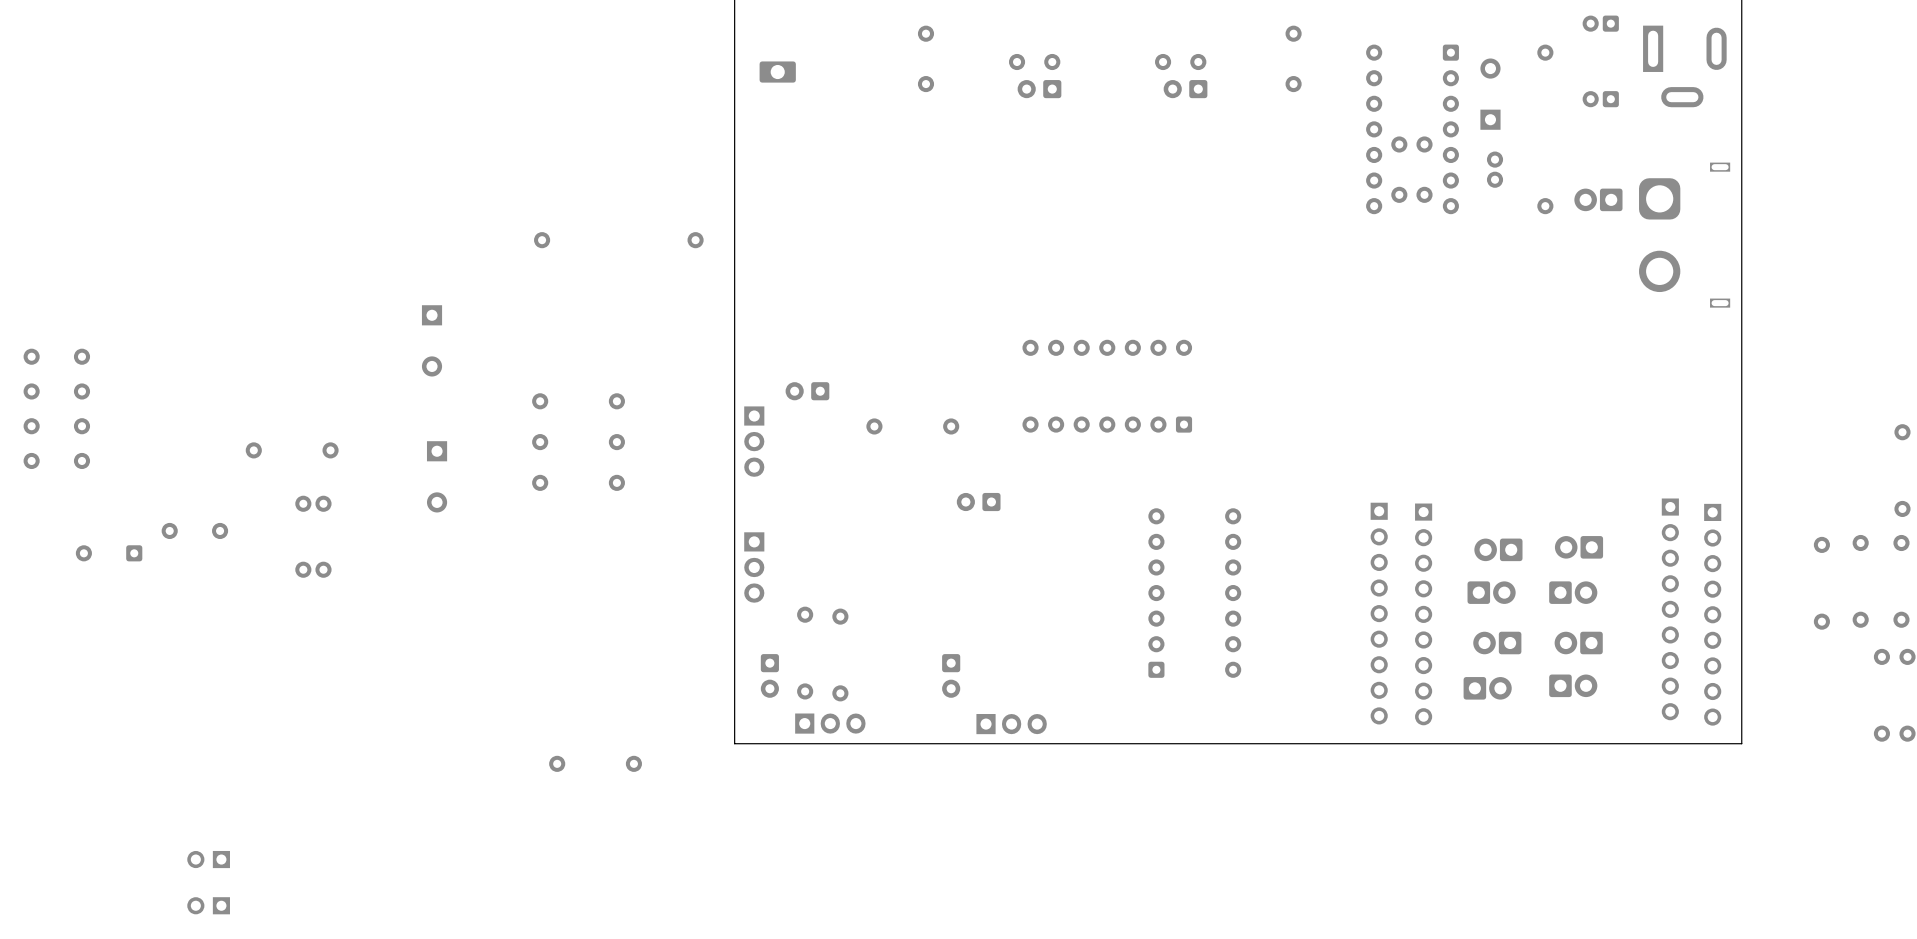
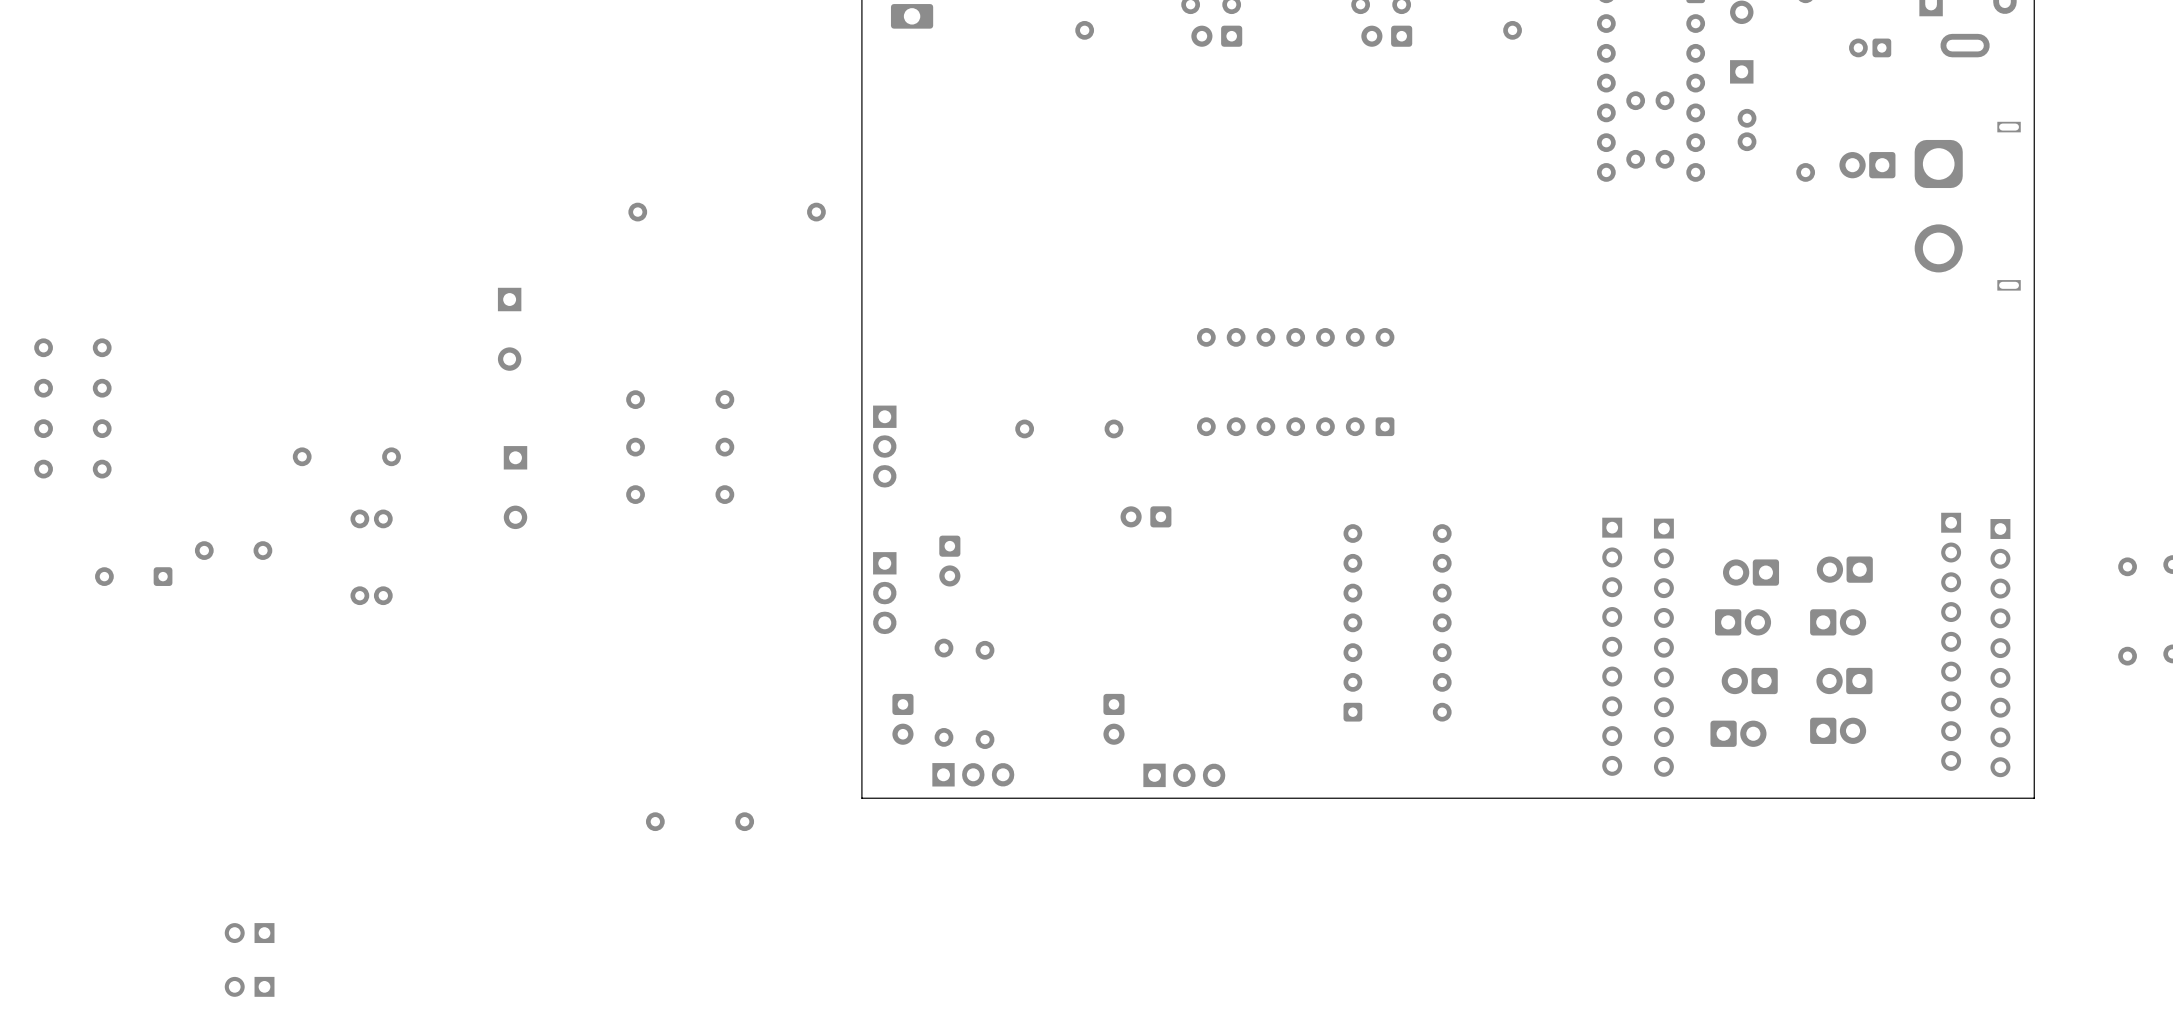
part rotation: 0° (807, 391) -> 90° counterclockwise (949, 561)
part position: (807, 391) -> (949, 561)

